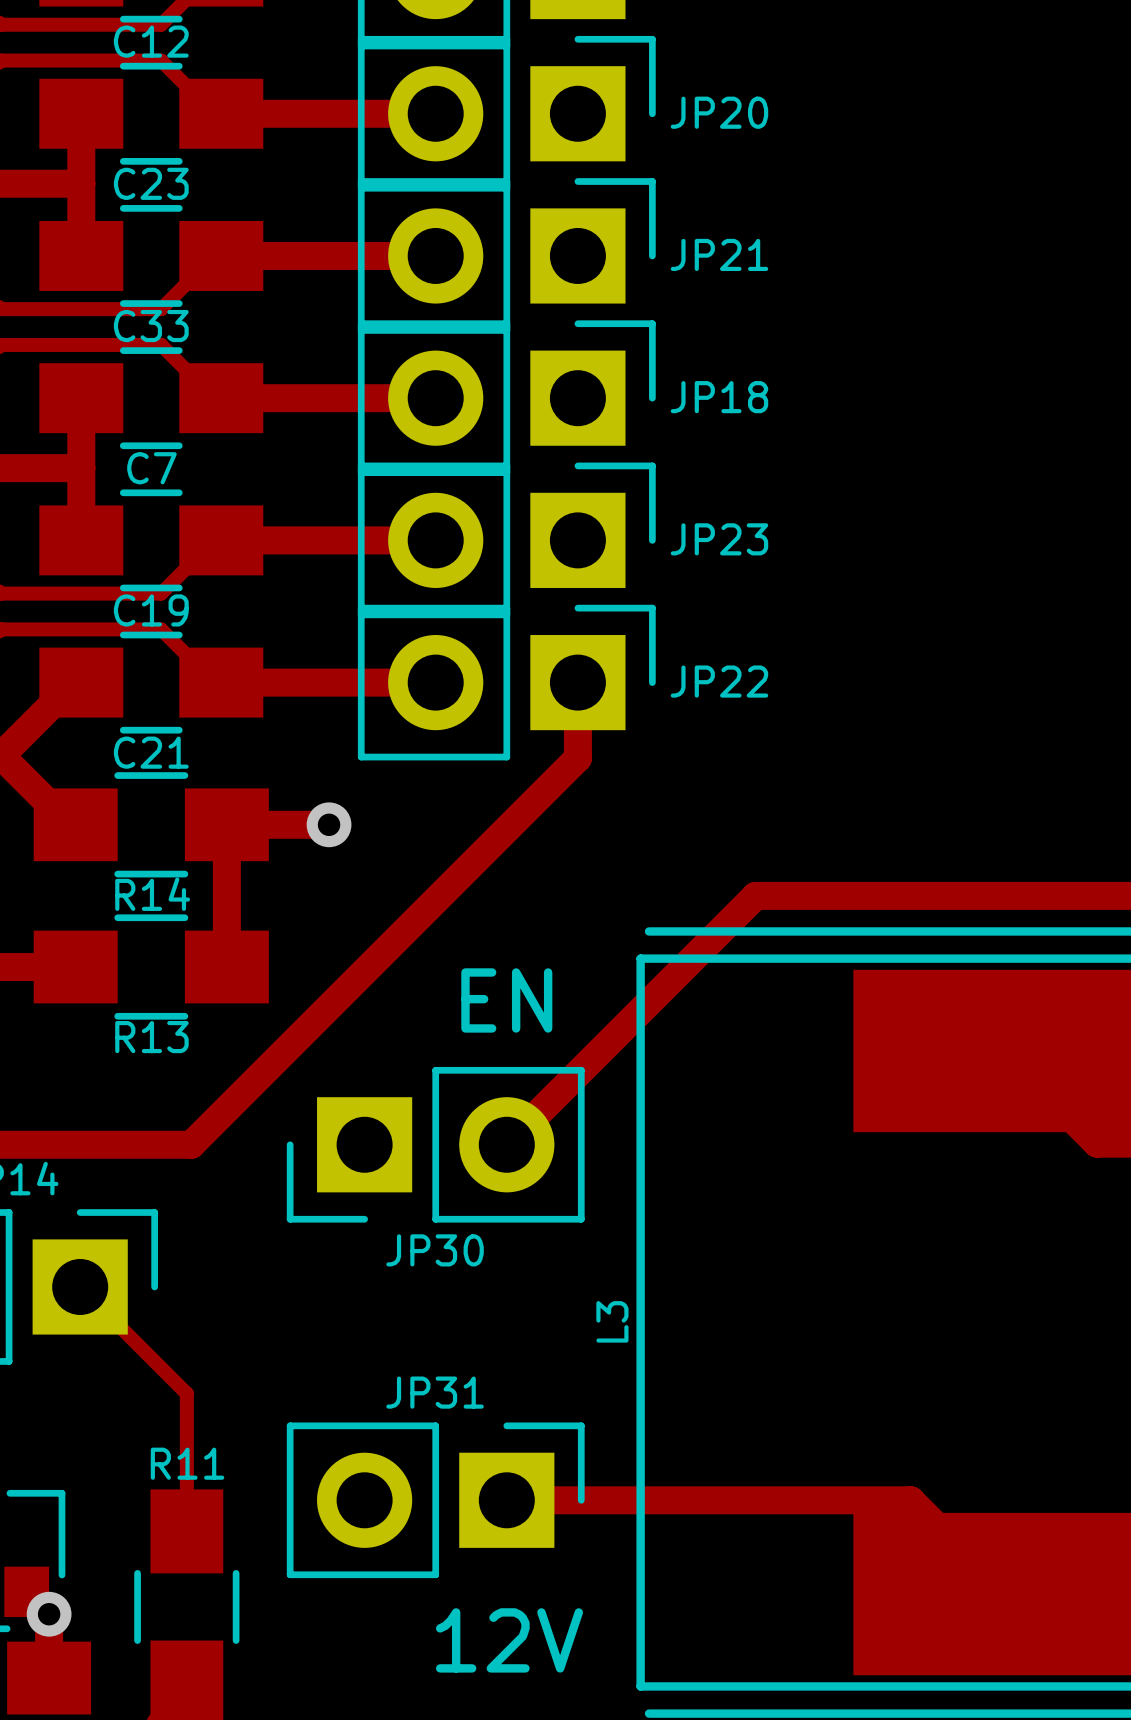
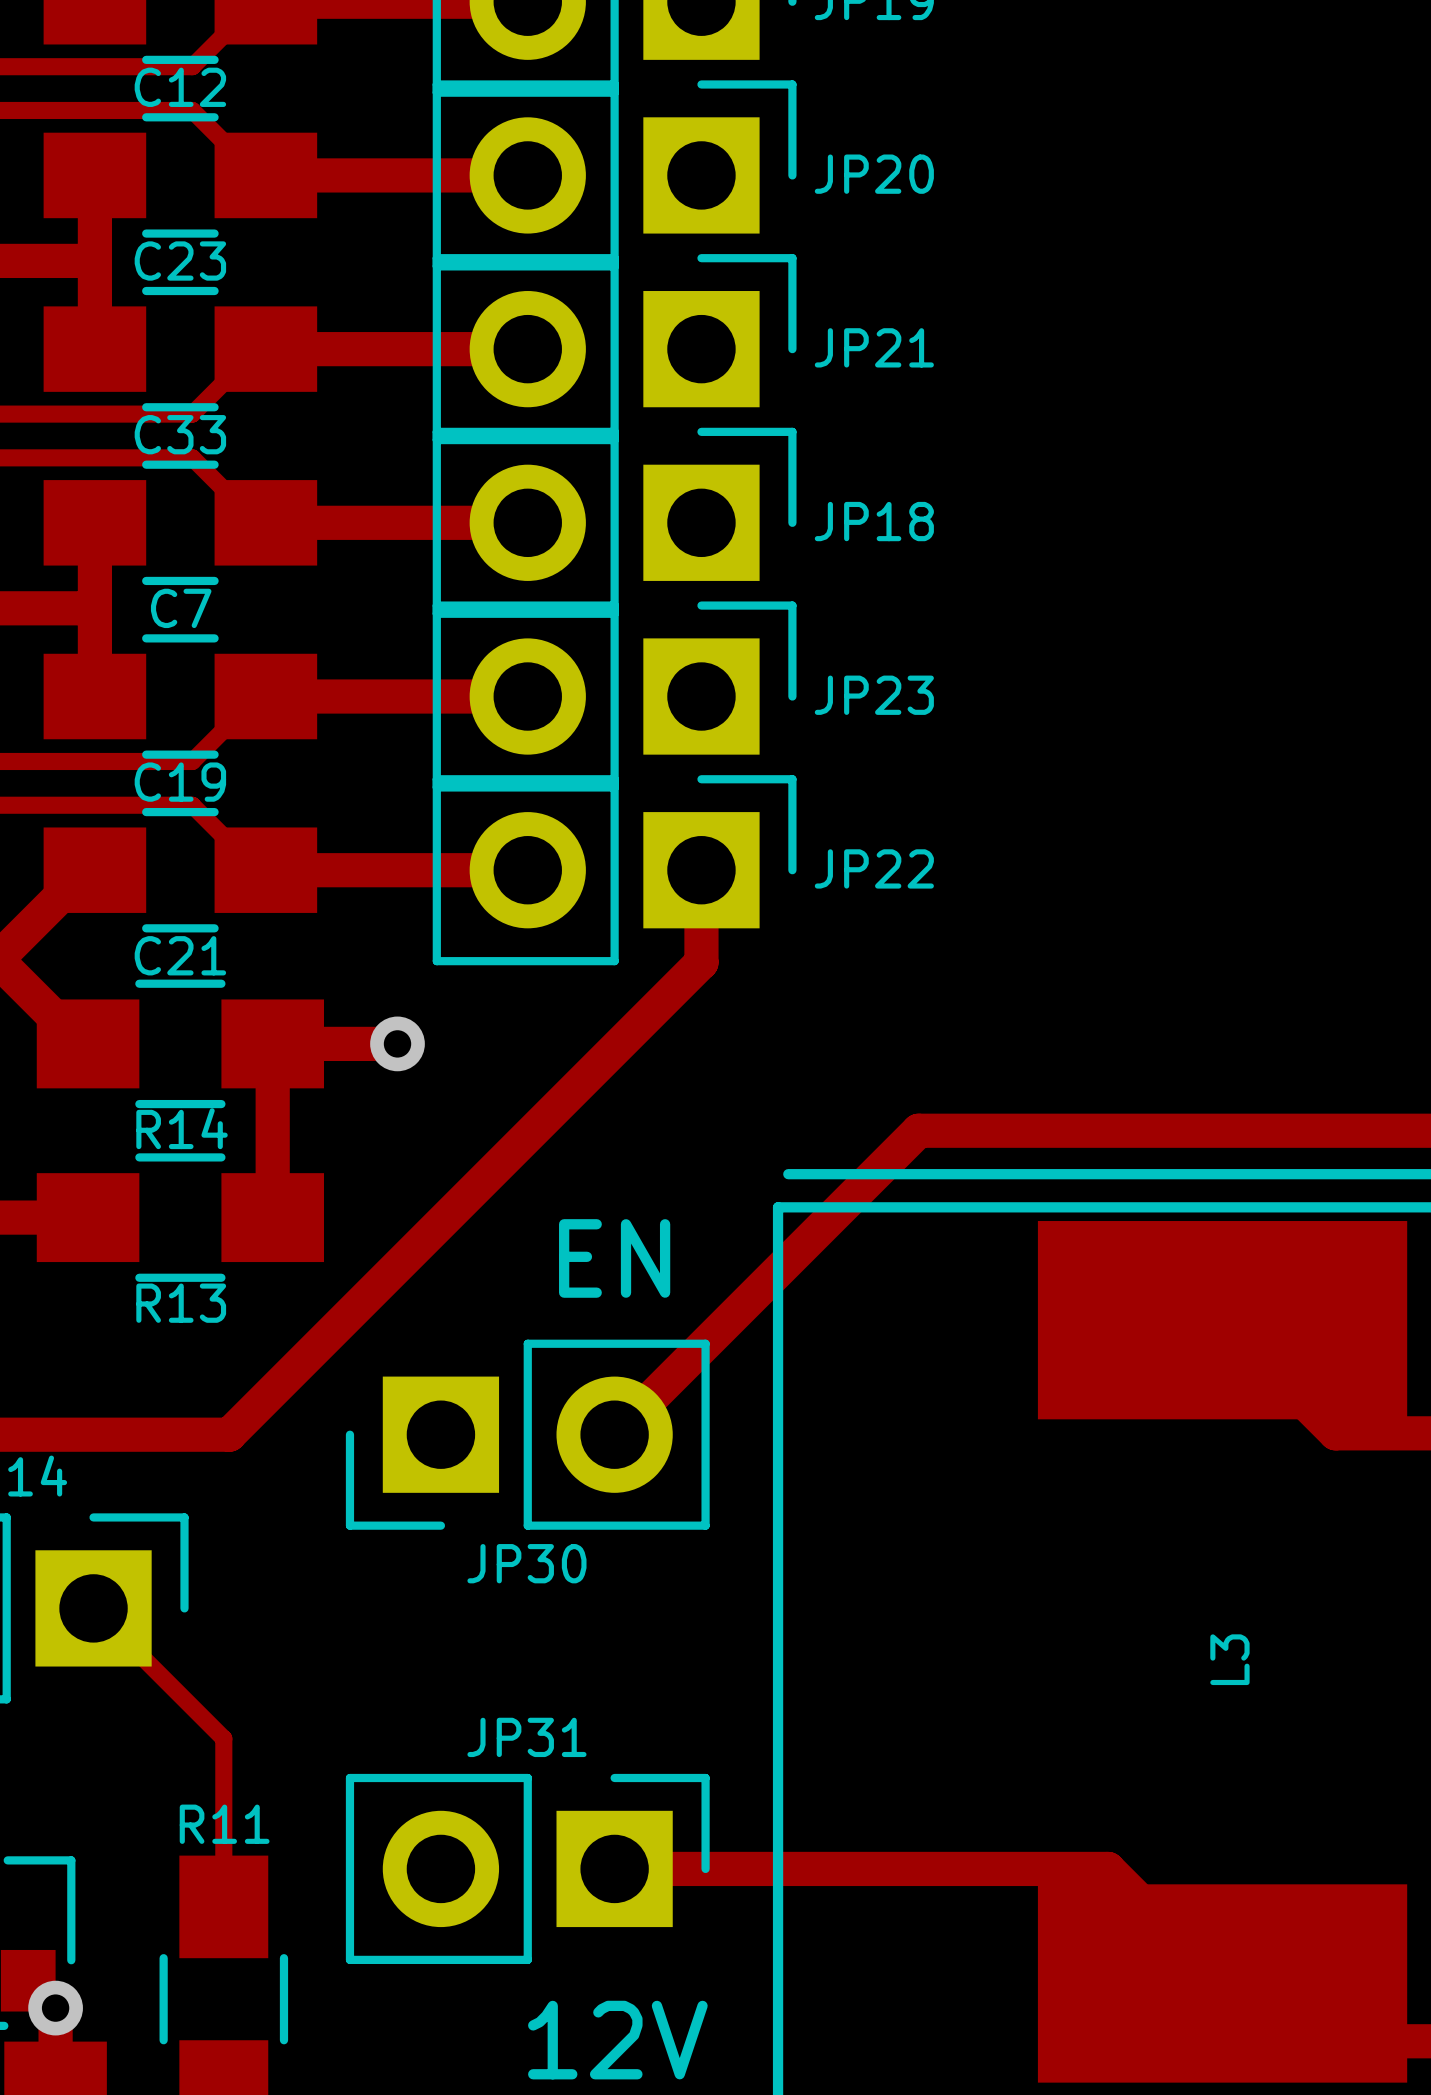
L3 name position: L3 (612, 1321) -> L3 (1229, 1659)

